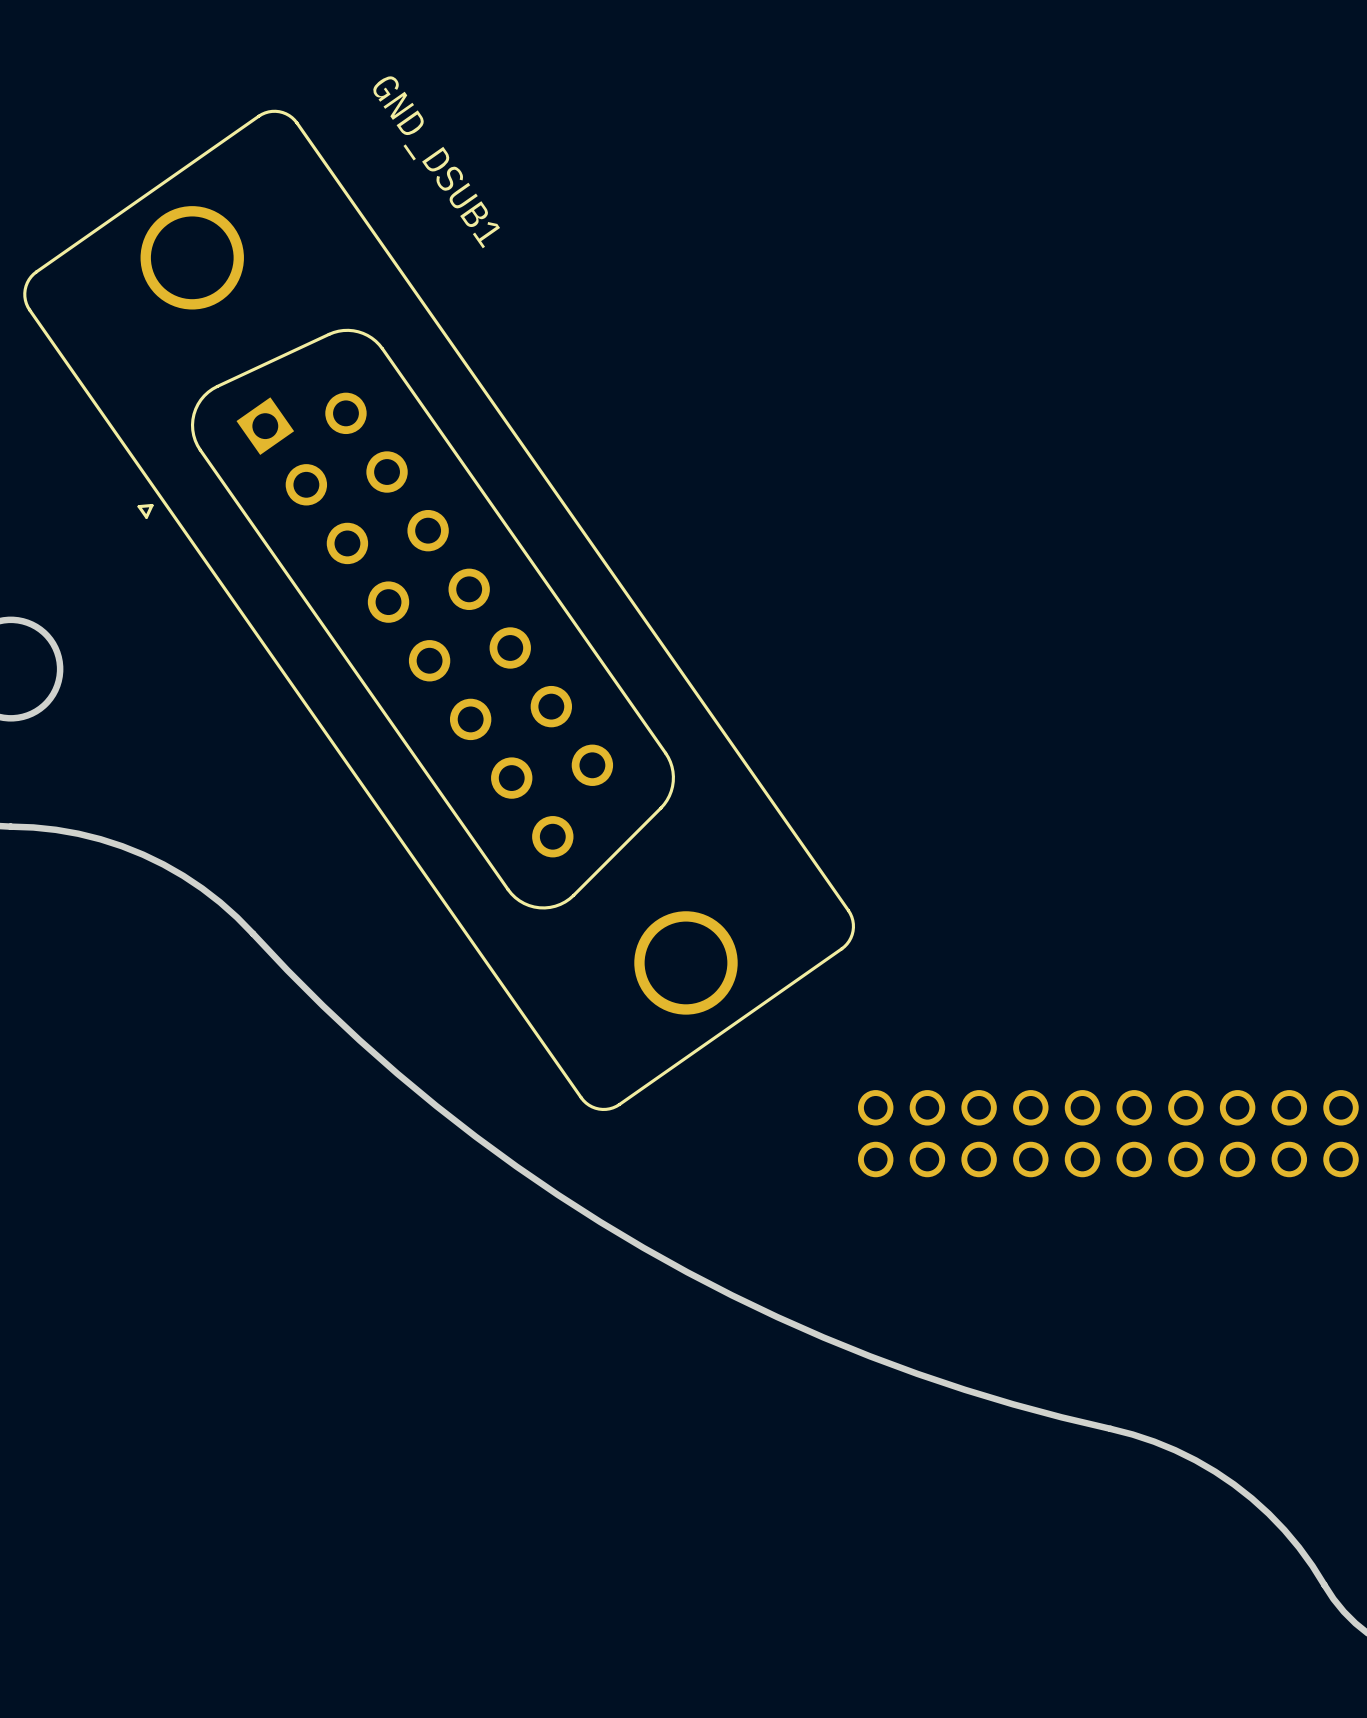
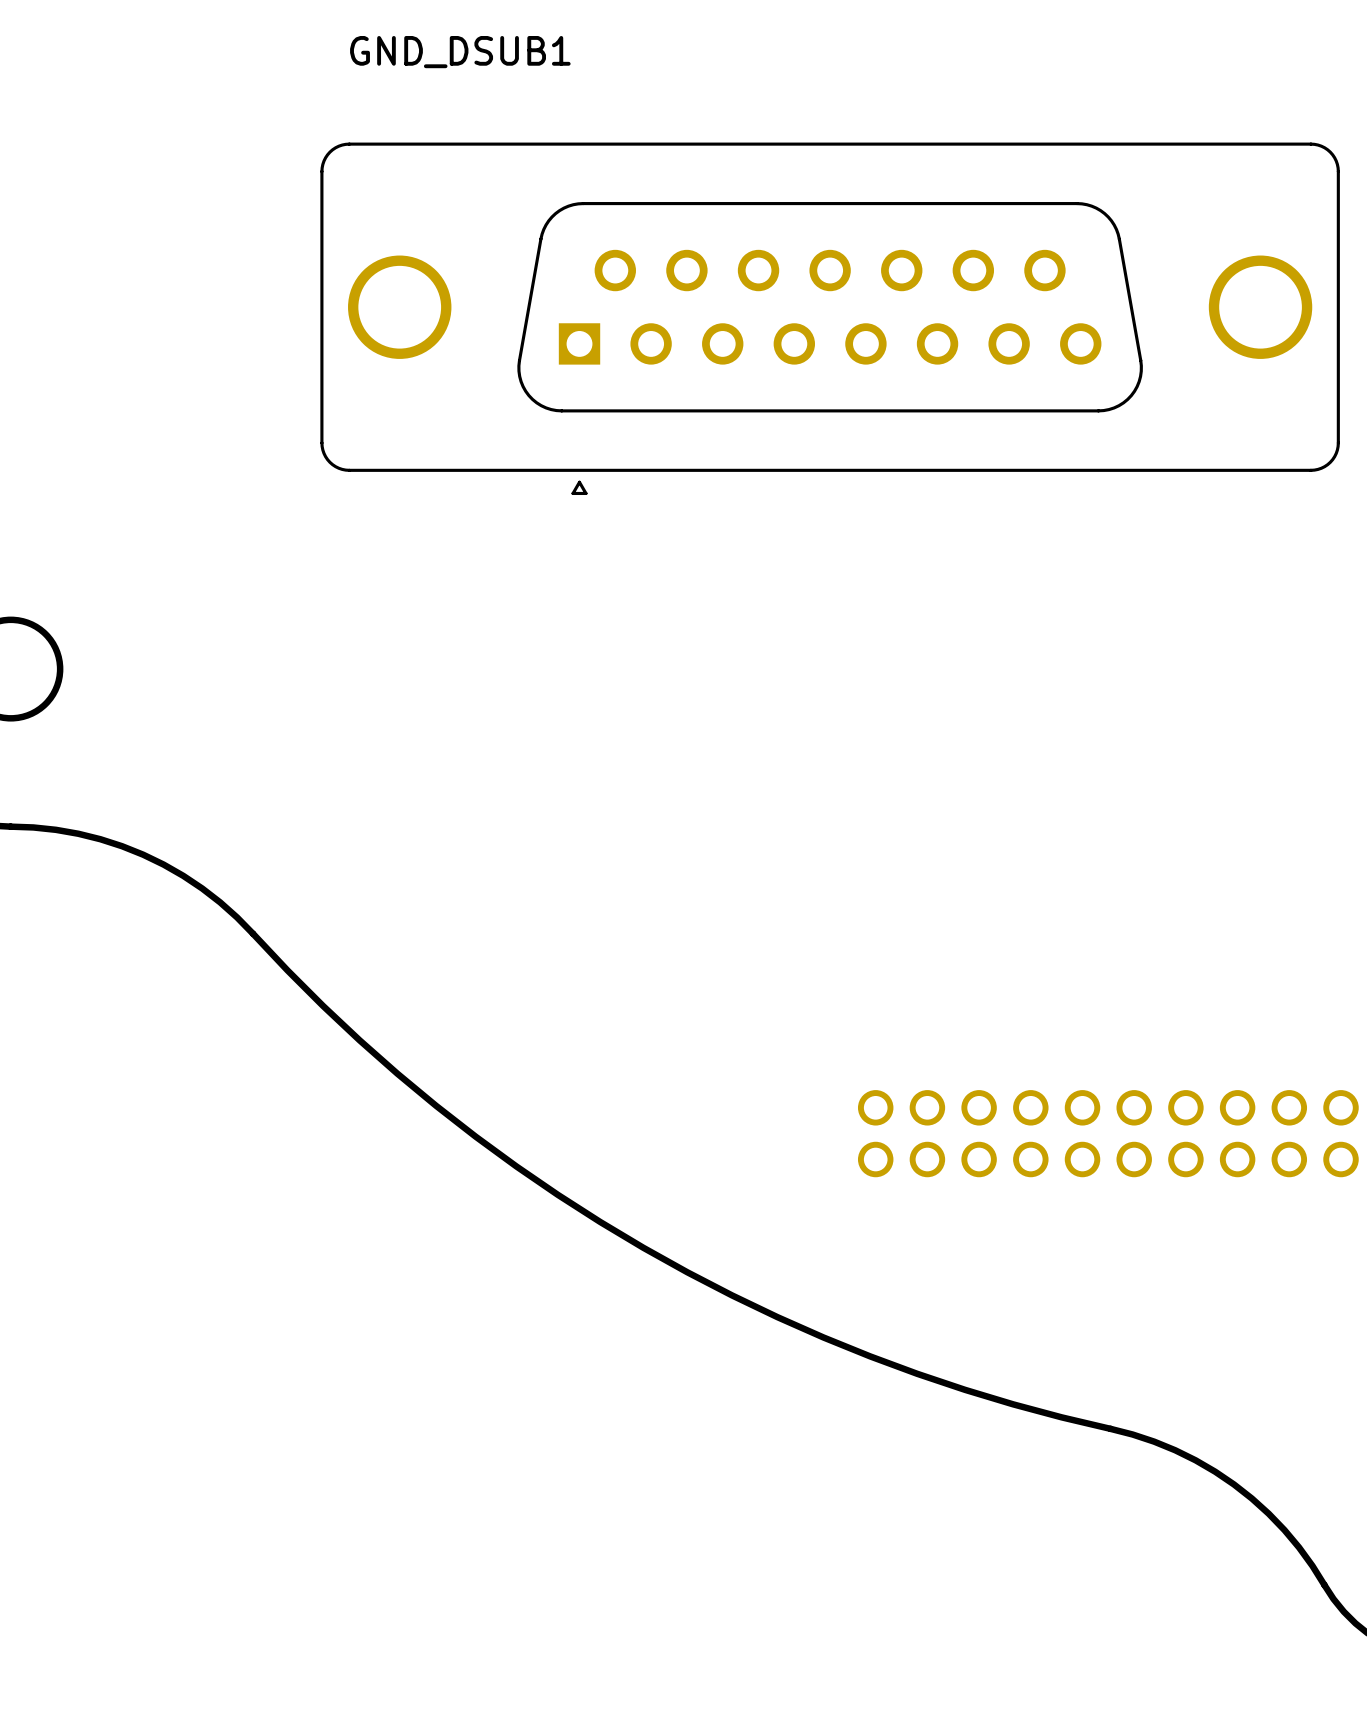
GND_DSUB1 rotation: 0° (439, 610) -> 55° counterclockwise (830, 318)

